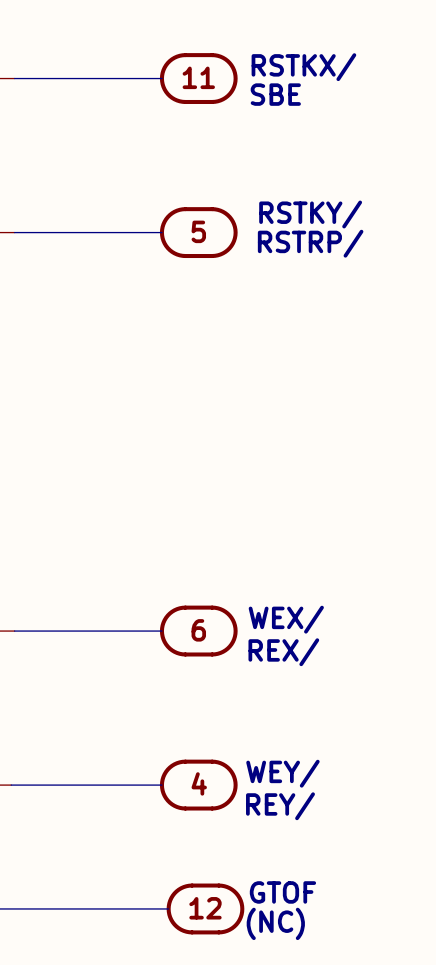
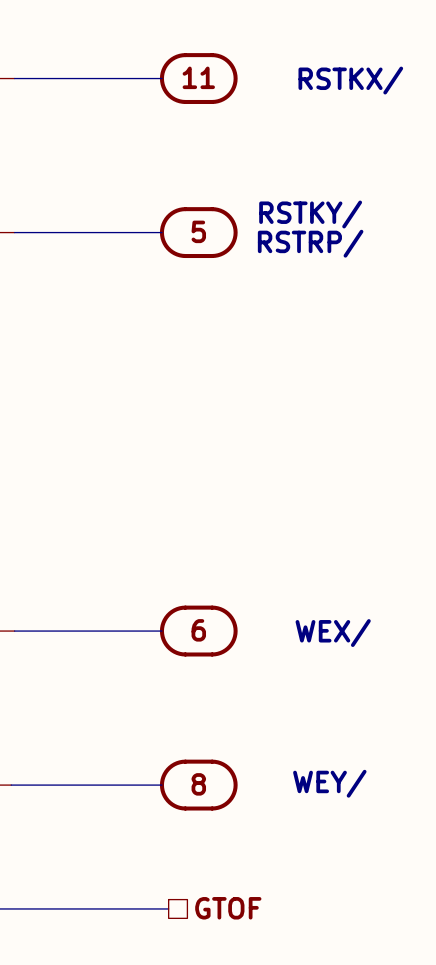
part text position: RSTKX/ (303, 67) -> RSTKX/ (350, 80)
part text: SBE (275, 94) -> none
part text position: WEX/ (286, 619) -> WEX/ (333, 633)
part text: REX/ (283, 652) -> none
part text position: WEY/ (282, 773) -> WEY/ (329, 783)
part text: 4 (199, 783) -> 8 (198, 784)
part text: REY/ (280, 806) -> none
part: (205, 908) -> none
hierarchical label: none -> GTOF (228, 908)

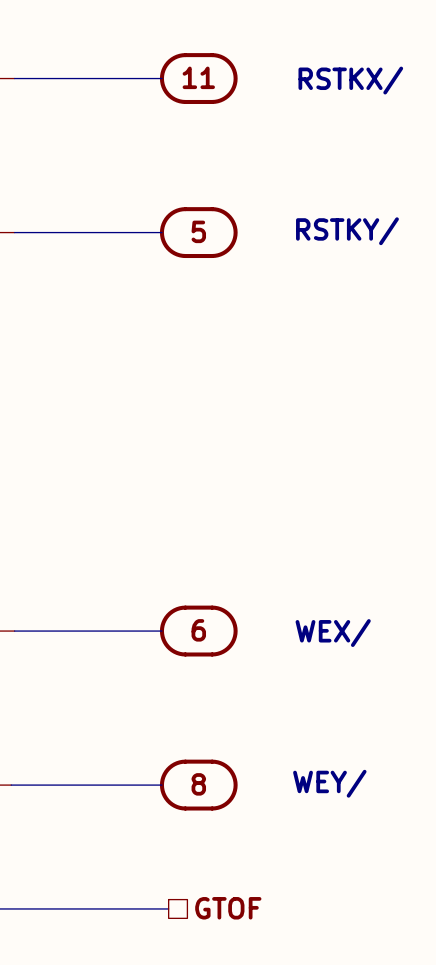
part text position: RSTKY/ (310, 214) -> RSTKY/ (347, 231)
part text: RSTRP/ (310, 243) -> none

